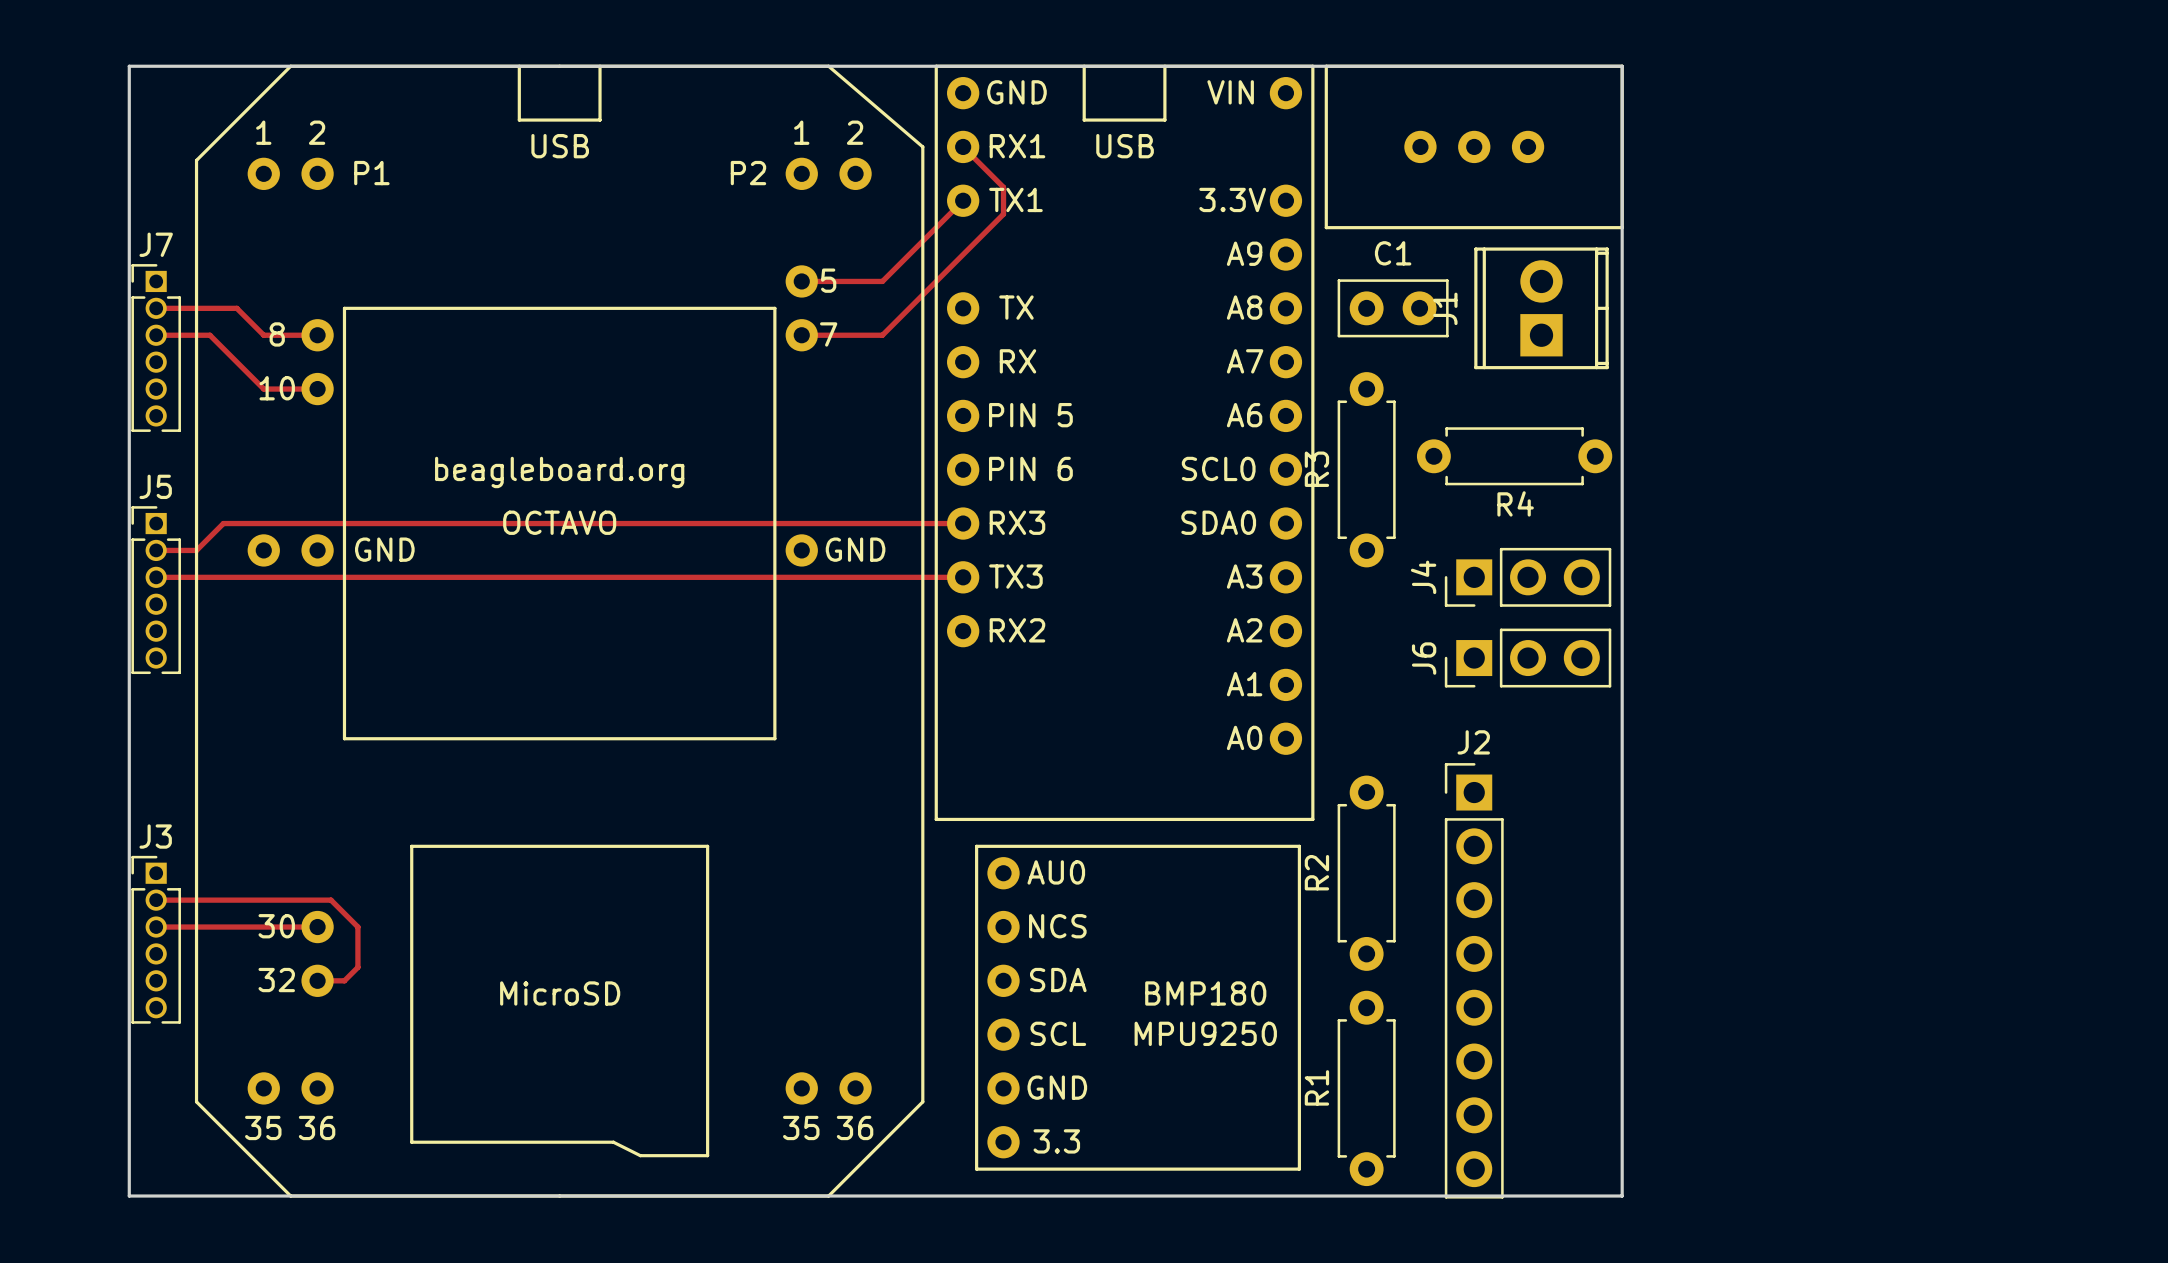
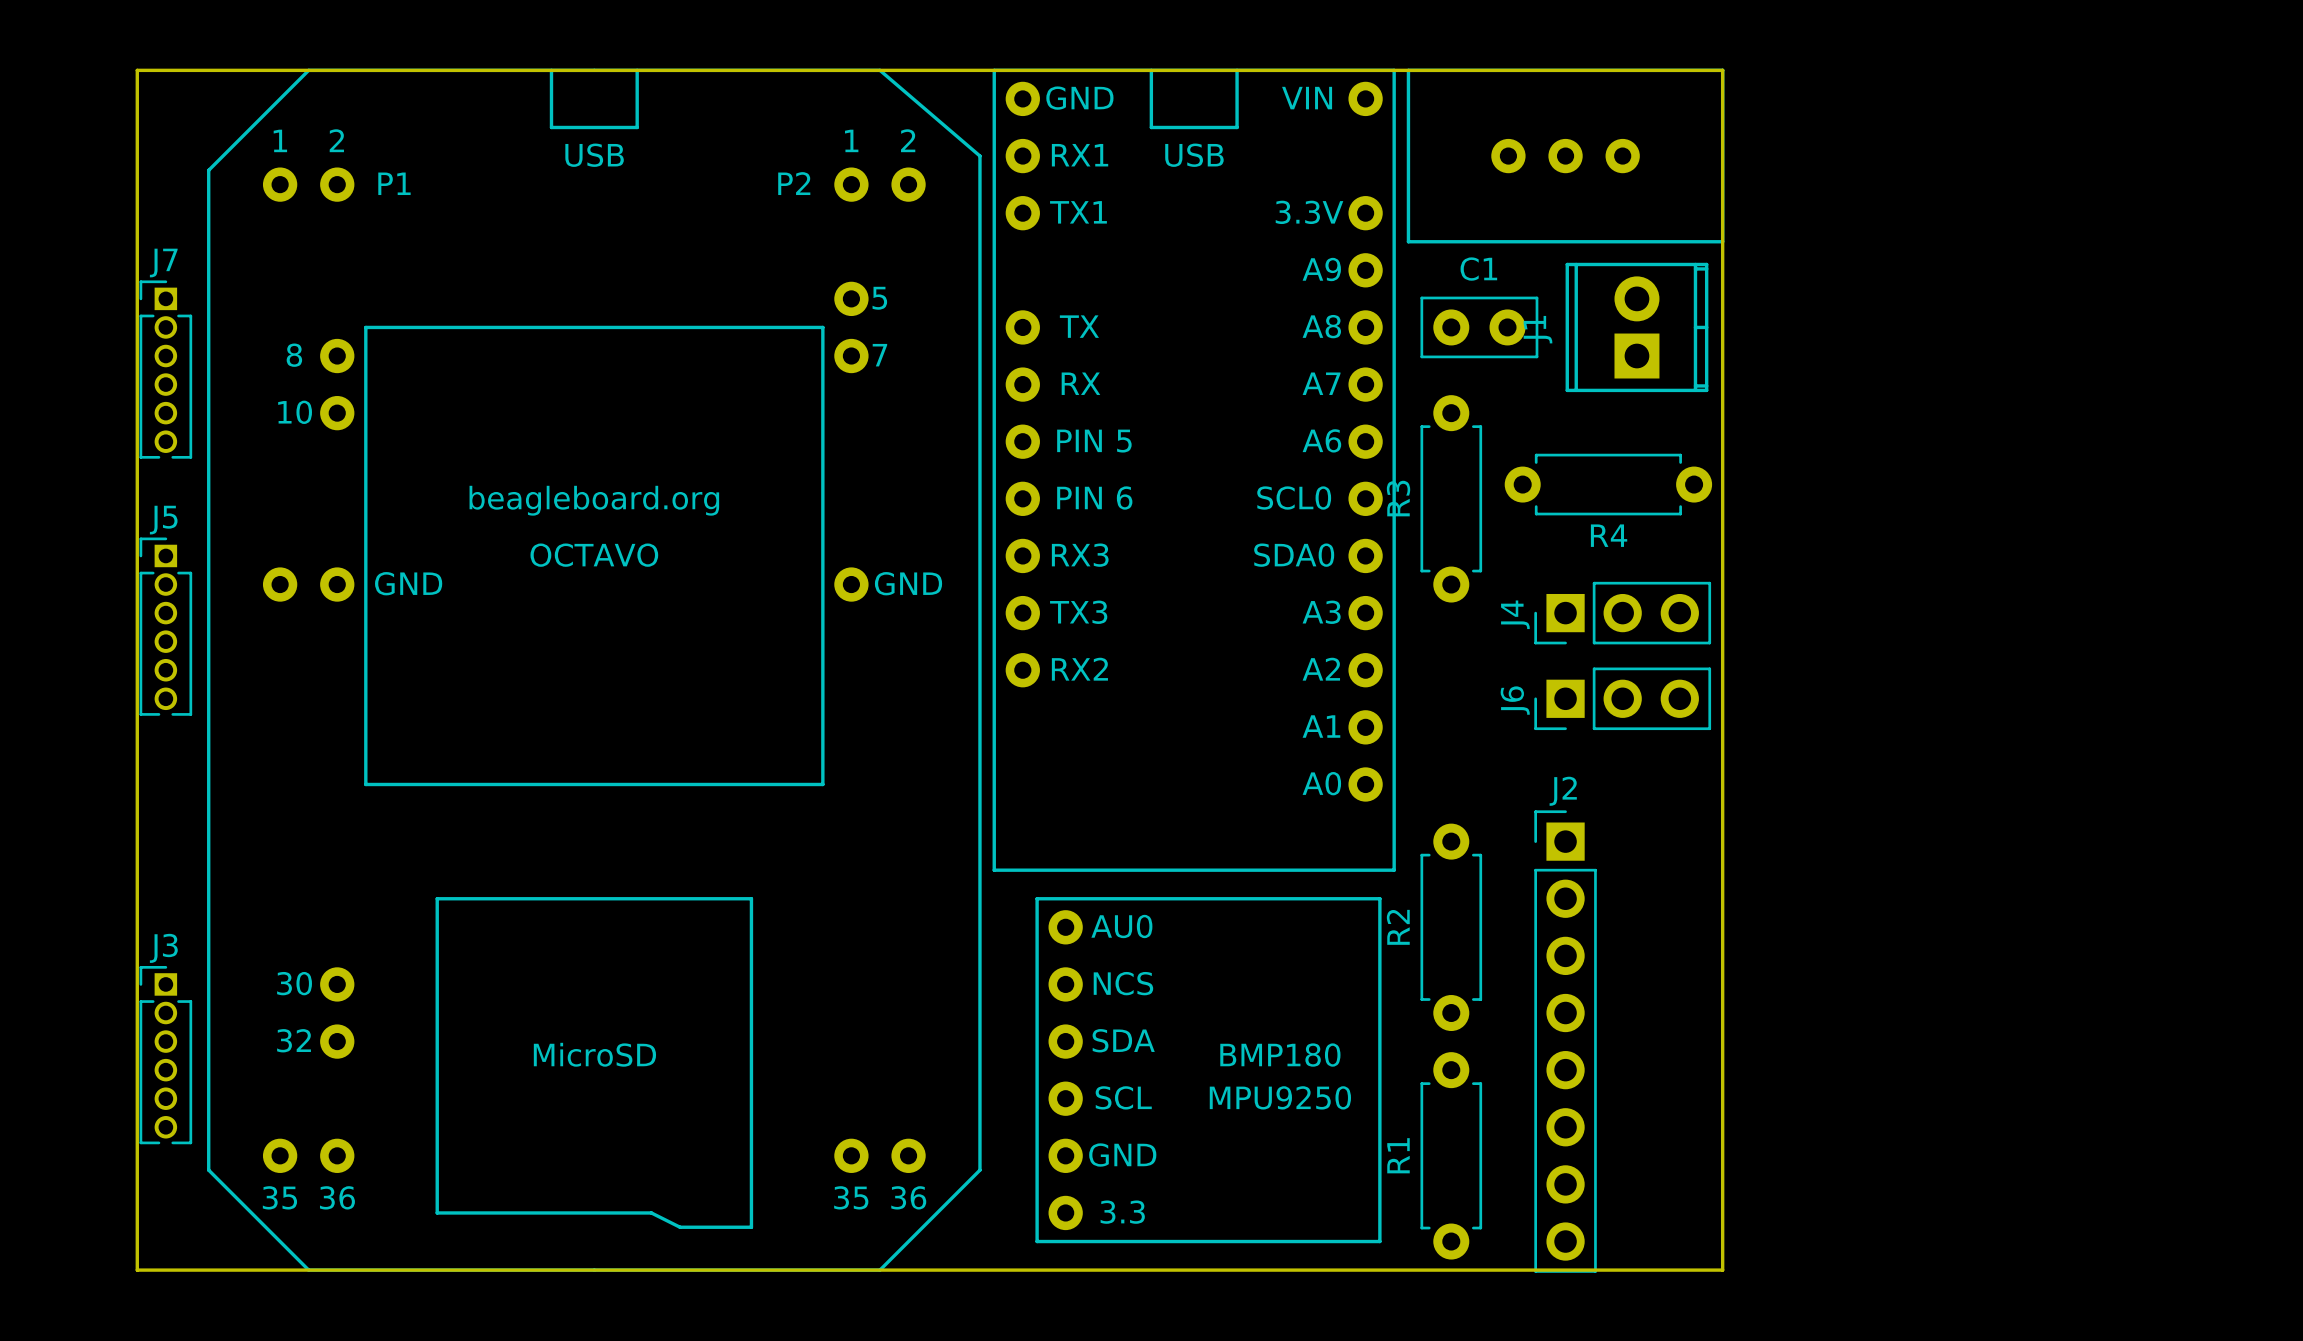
track: (963, 146) (1003, 187) (1003, 214) (882, 335) (801, 335) -> none
track: (963, 200) (882, 281) (801, 281) -> none
track: (156, 308) (236, 308) (263, 335) (317, 335) -> none
track: (156, 335) (209, 335) (263, 389) (317, 389) -> none
track: (963, 523) (223, 523) (196, 550) (156, 550) -> none
track: (156, 577) (963, 577) -> none
track: (156, 900) (331, 900) (357, 927) (357, 967) (344, 980) (317, 980) -> none
track: (156, 927) (317, 927) -> none
J3 position: (156, 939) -> (165, 1055)

